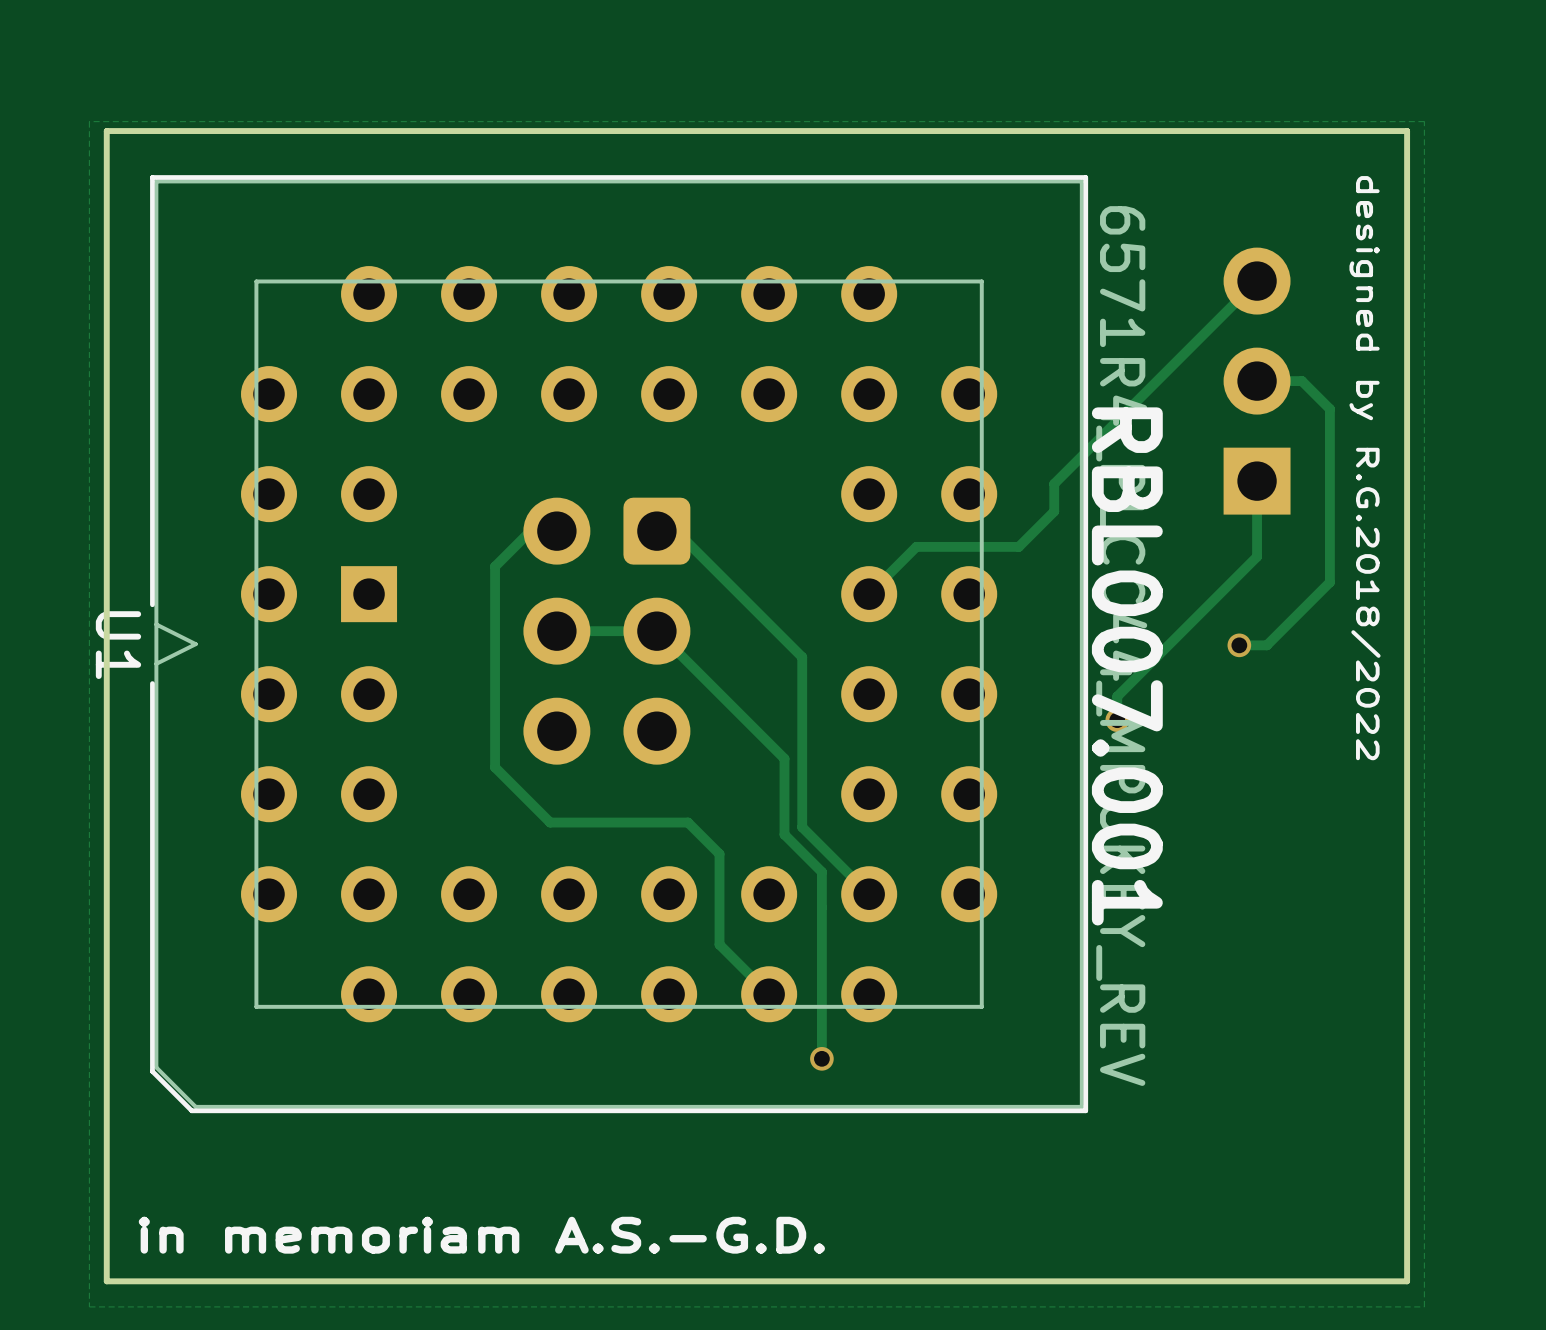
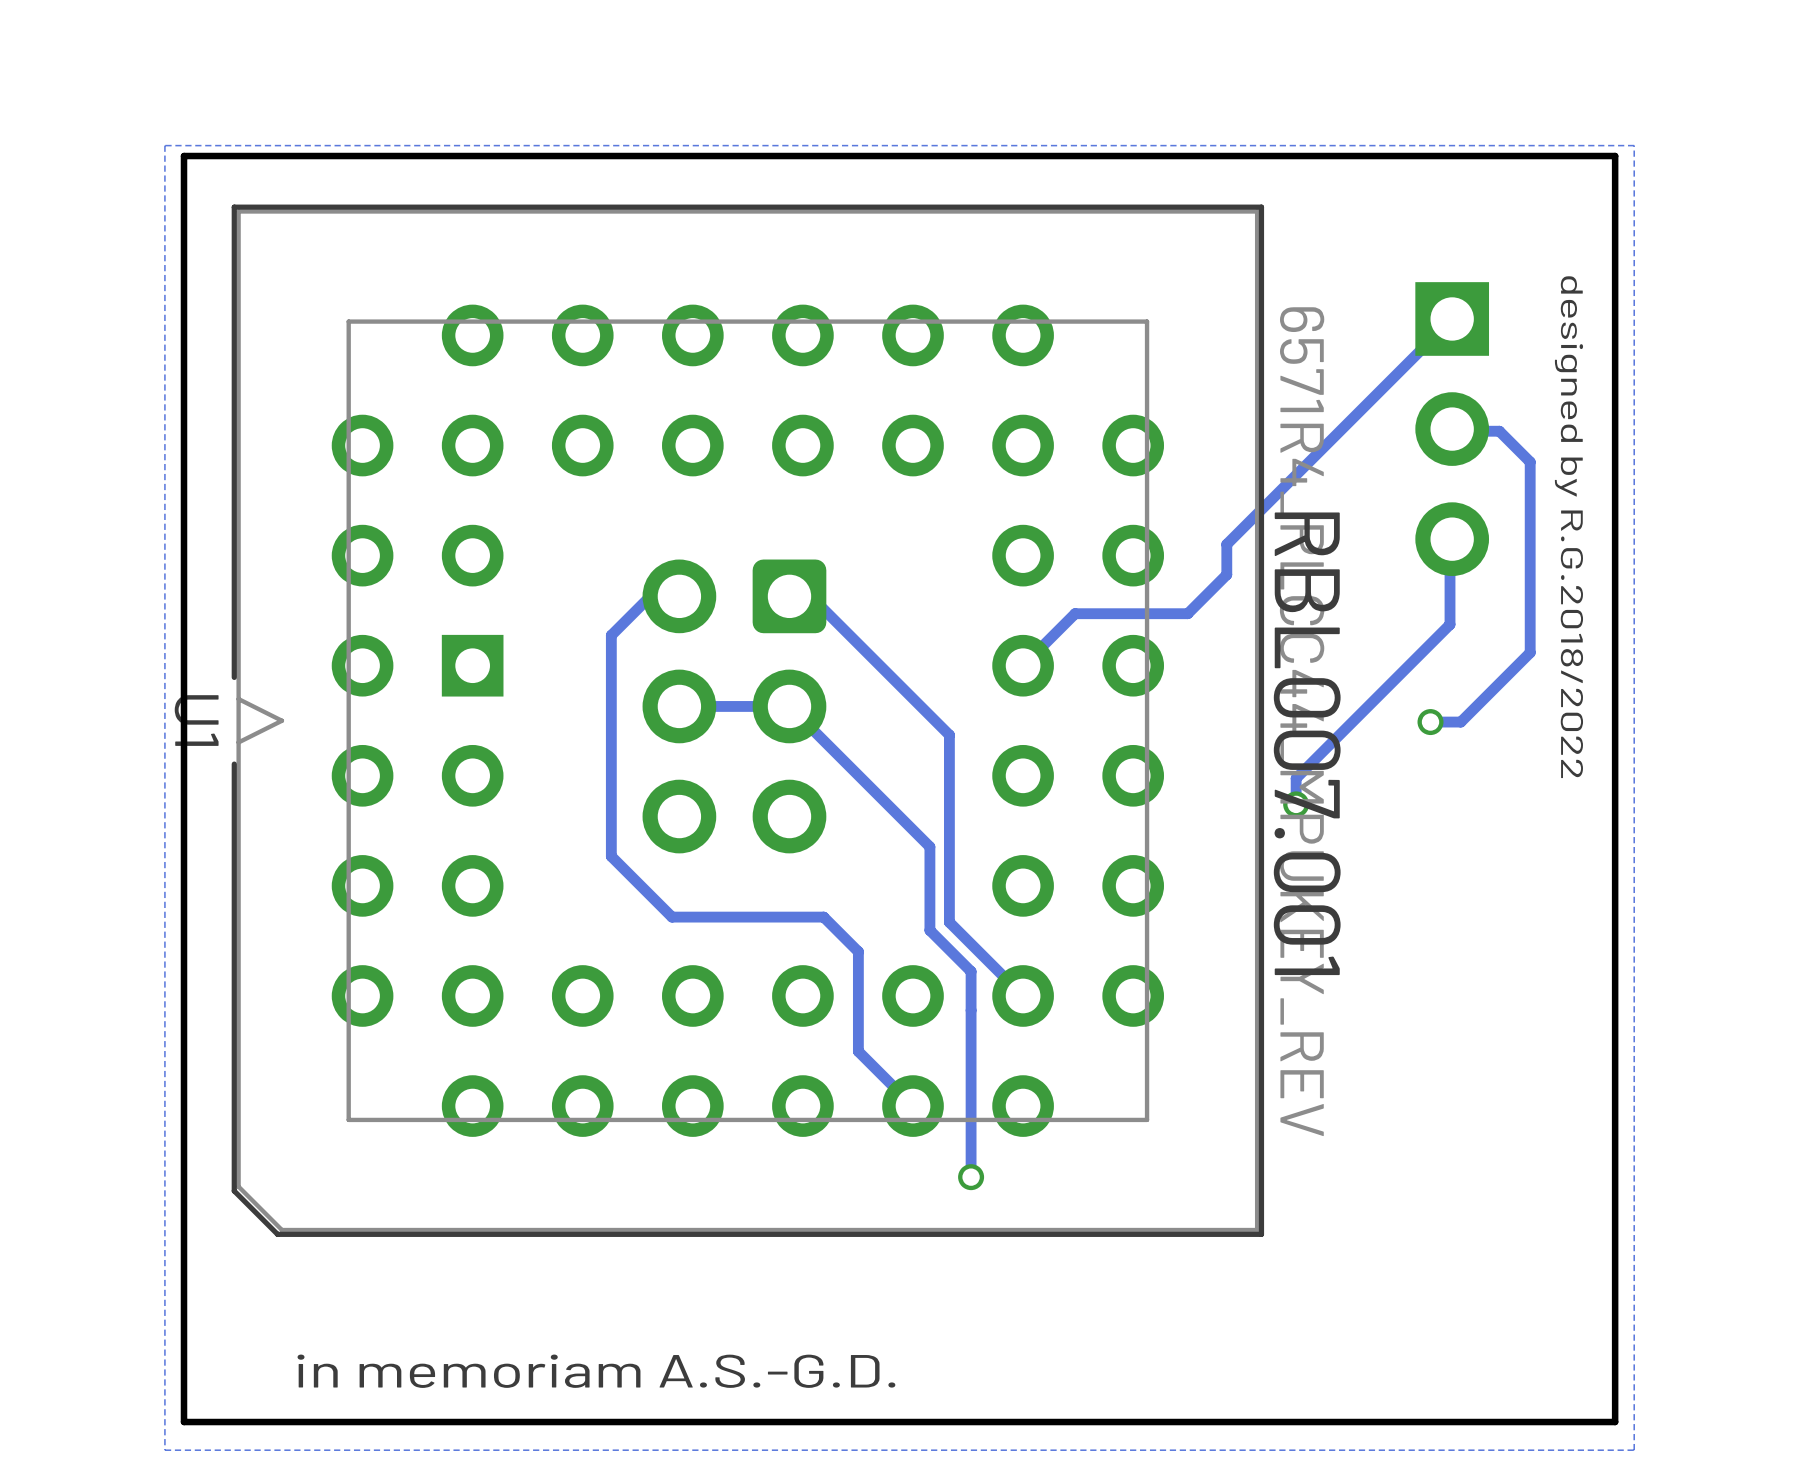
part rotation: 0° (1257, 381) -> 180° (1452, 429)

